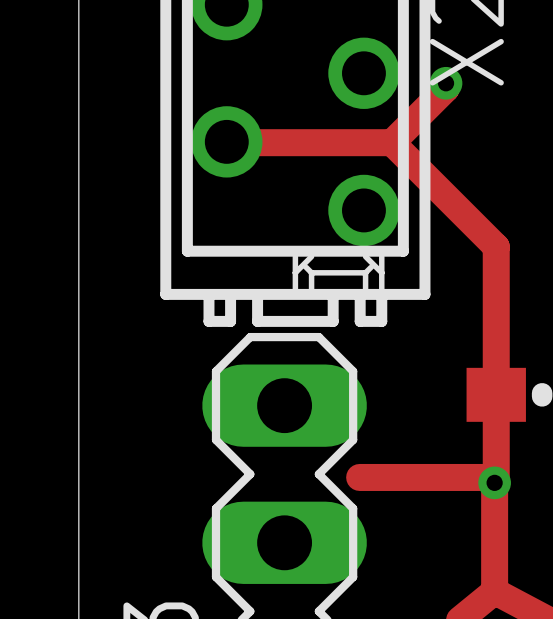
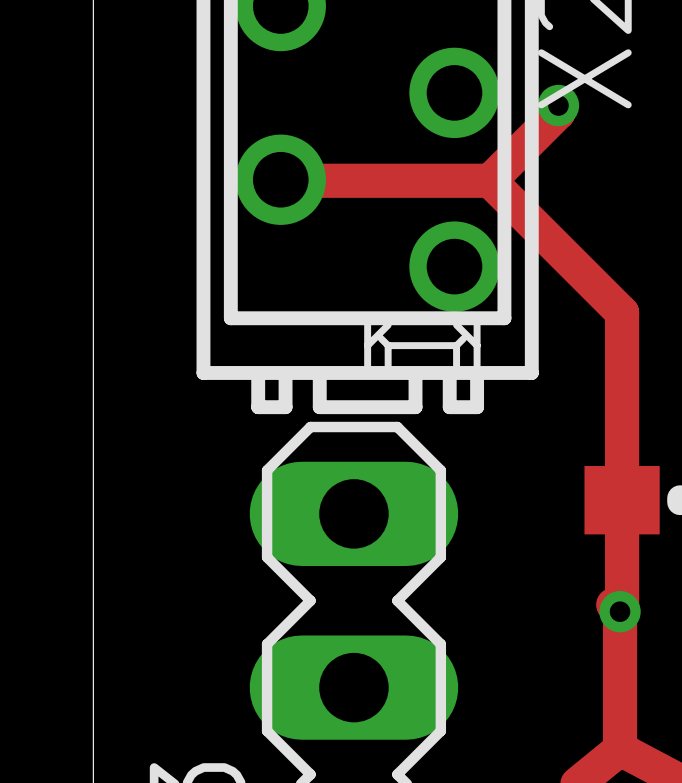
track: (359, 477) (489, 477) -> none

